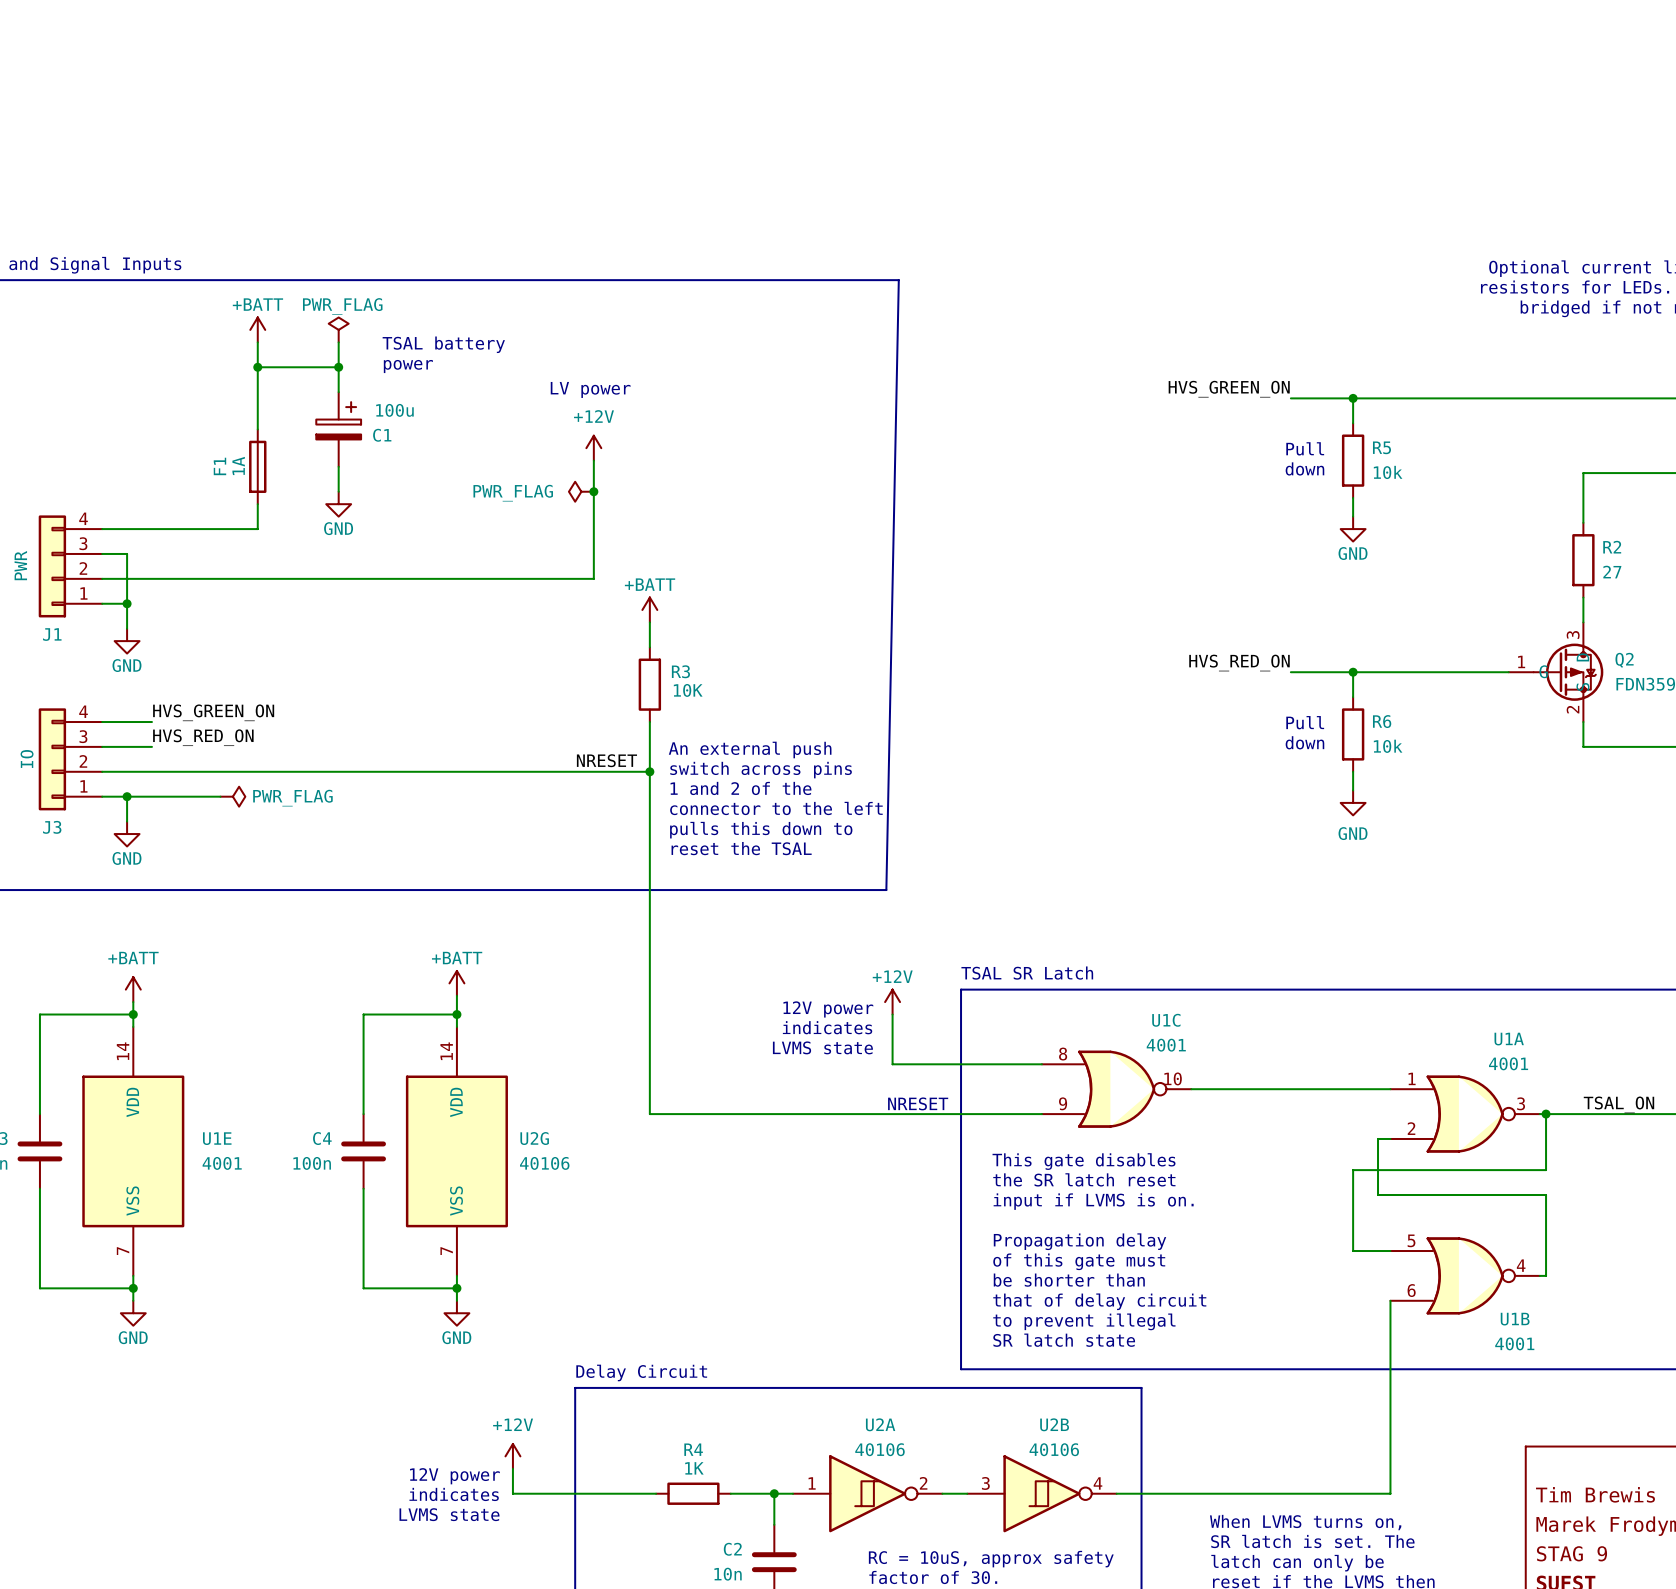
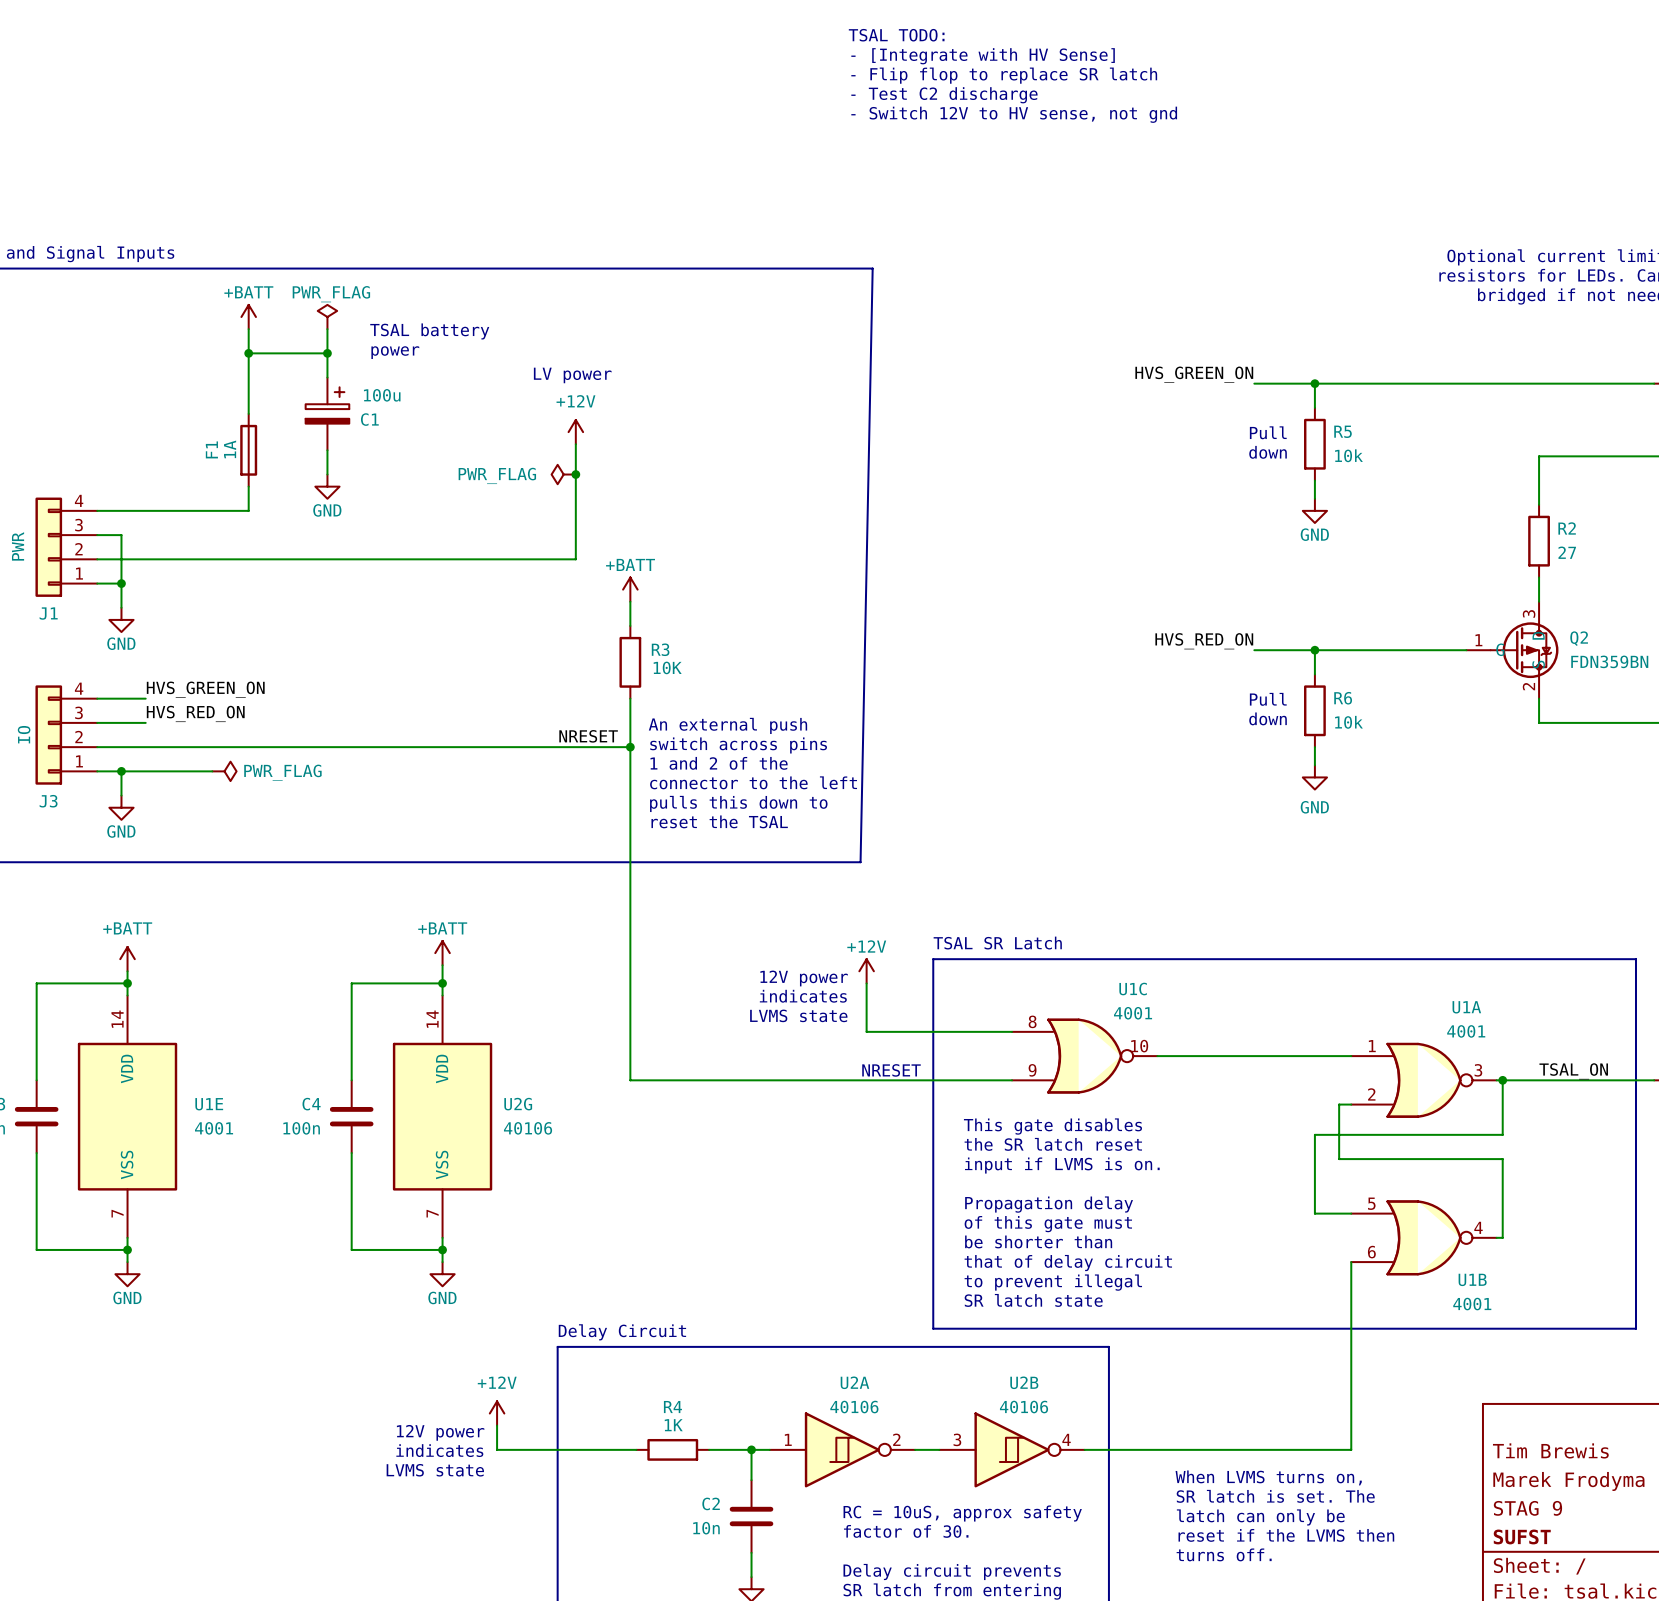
text: none -> TSAL TODO: (896, 35)
text: none -> - [Integrate with HV Sense] (983, 56)
text: none -> - Flip flop to replace SR latch (1004, 75)
text: none -> - Test C2 discharge (944, 95)
text: none -> - Switch 12V to HV sense, not gnd (1014, 114)

